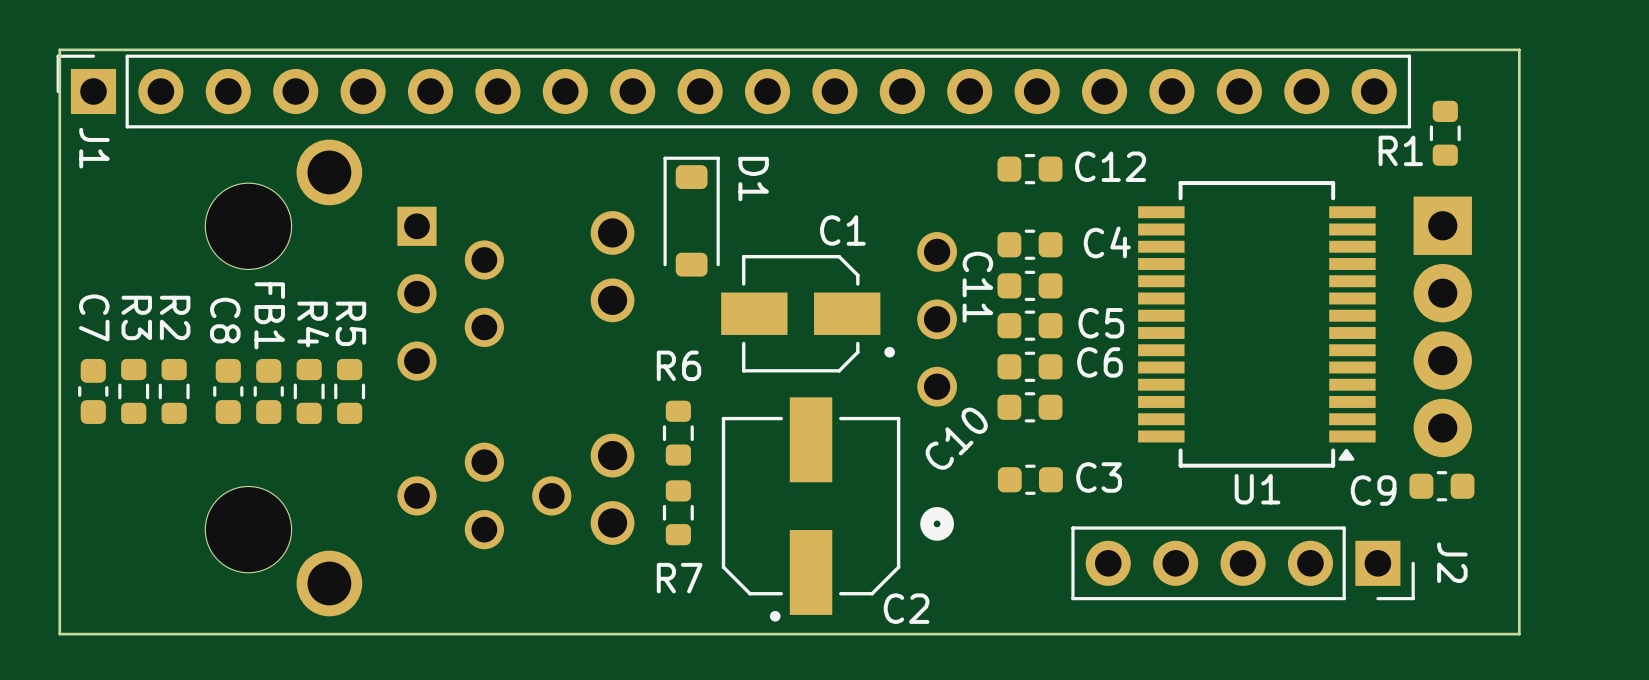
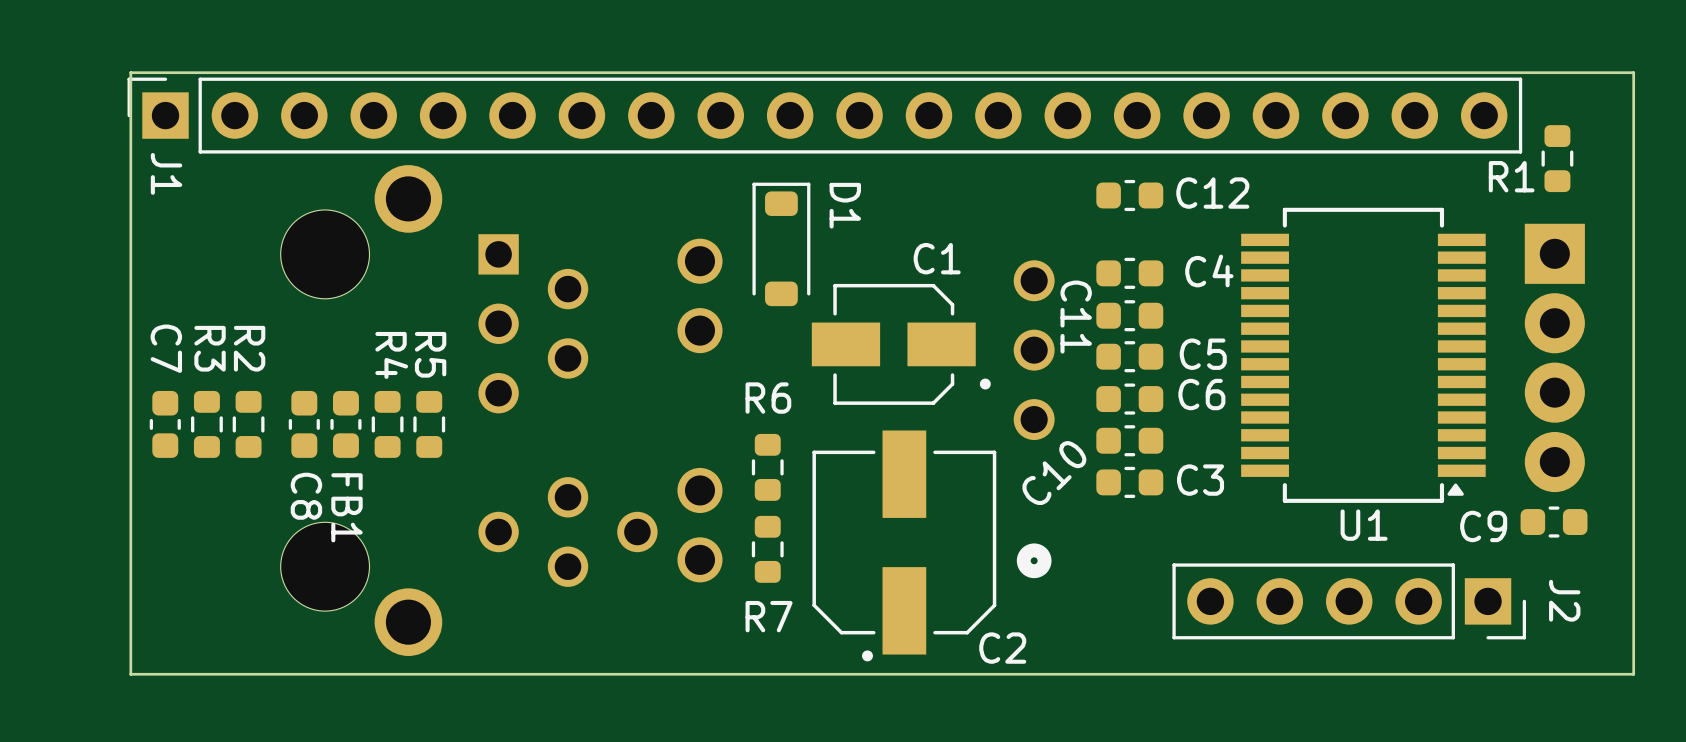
FB1 name position: FB1 (269, 315) -> FB1 (346, 507)
C8 name position: C8 (225, 320) -> C8 (306, 496)
C3 position: (1030, 479) -> (1129, 482)

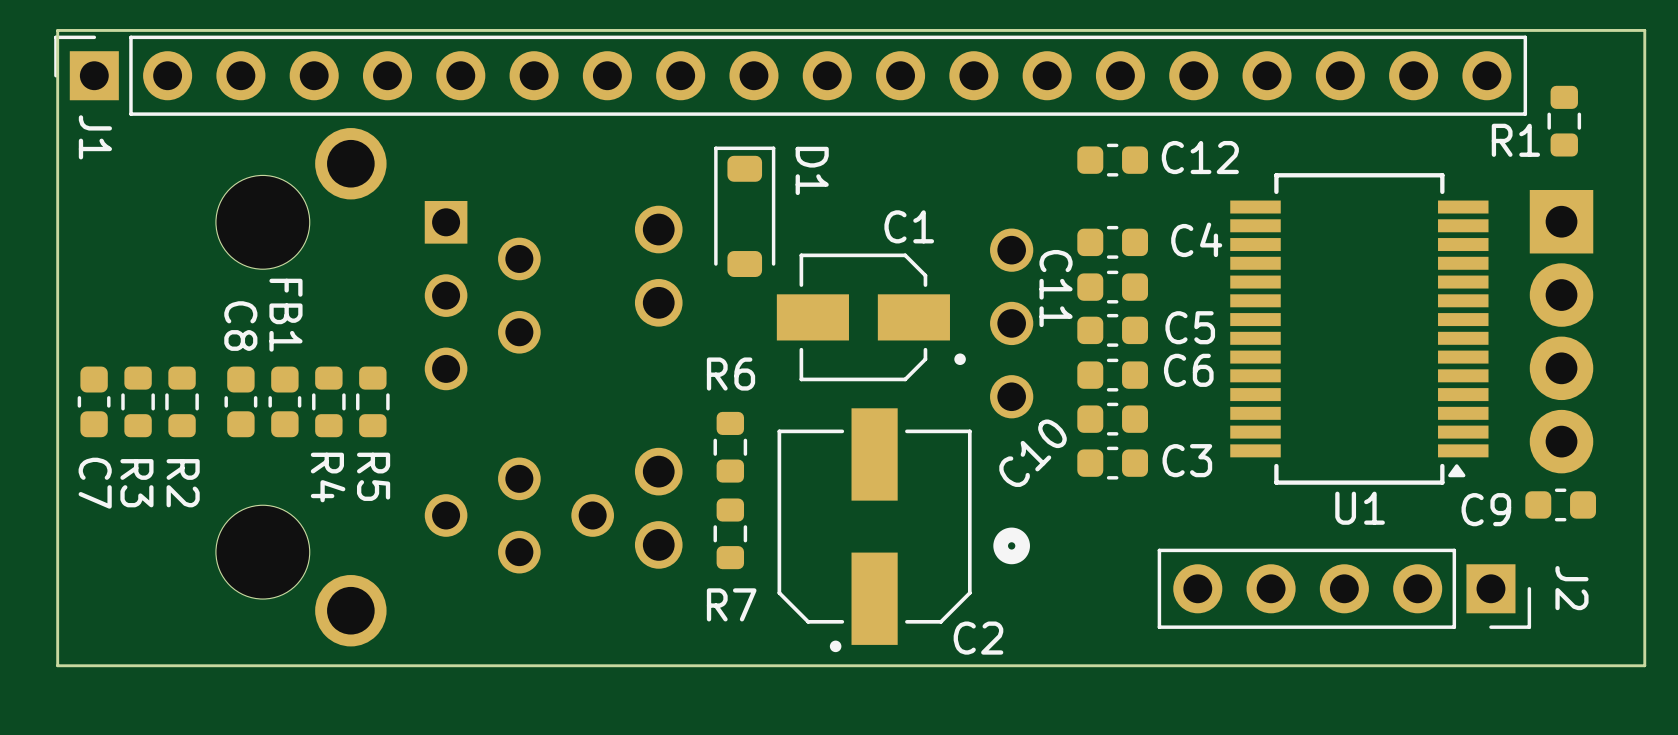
C7 name position: C7 (166, 348) -> C7 (95, 483)
R3 name position: R3 (210, 348) -> R3 (136, 483)
R2 name position: R2 (249, 348) -> R2 (183, 483)
R5 name position: R5 (430, 354) -> R5 (373, 476)
R4 name position: R4 (391, 355) -> R4 (328, 477)
C8 name position: C8 (306, 496) -> C8 (240, 326)
FB1 name position: FB1 (346, 507) -> FB1 (285, 315)

